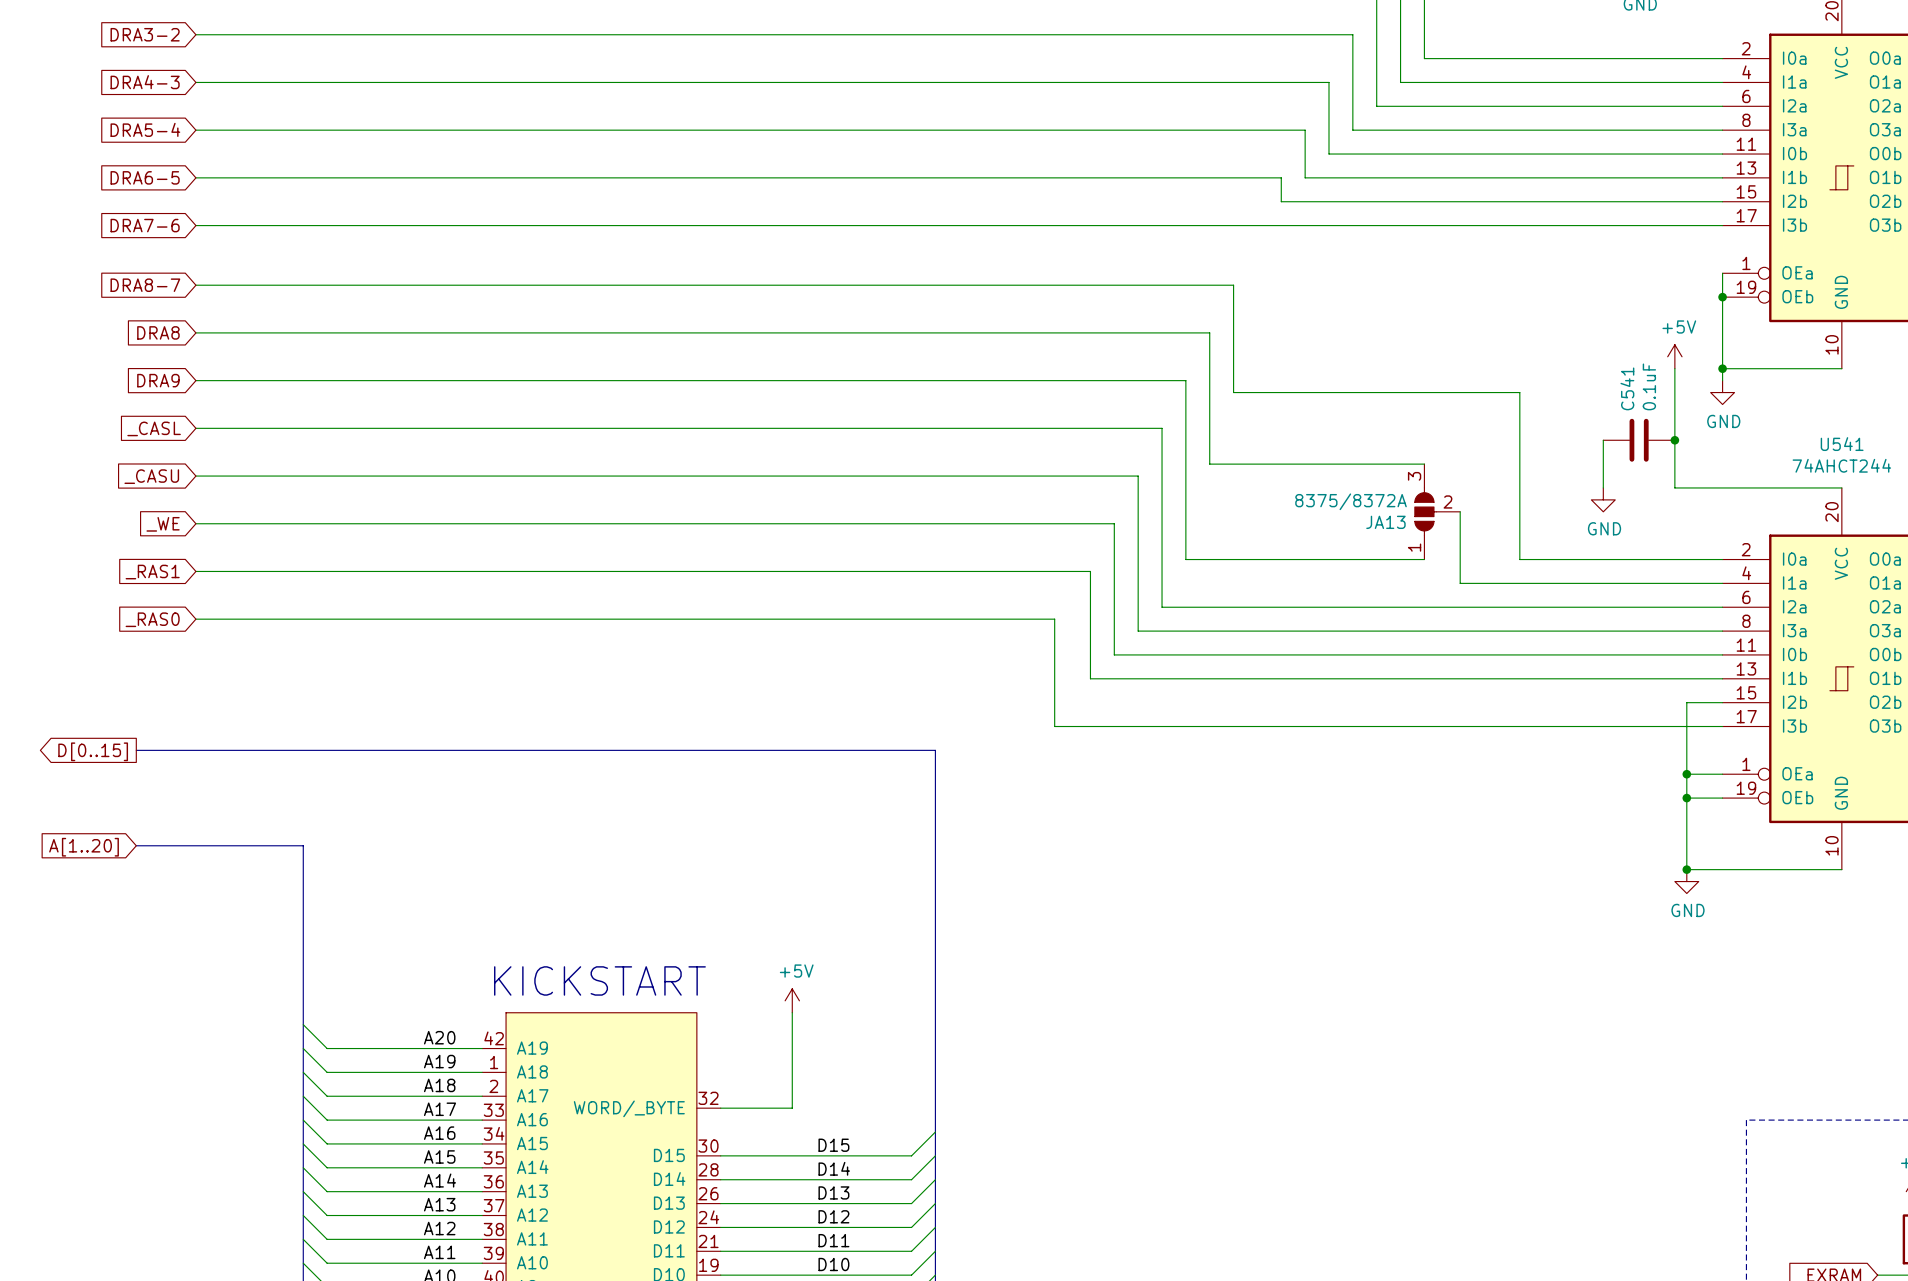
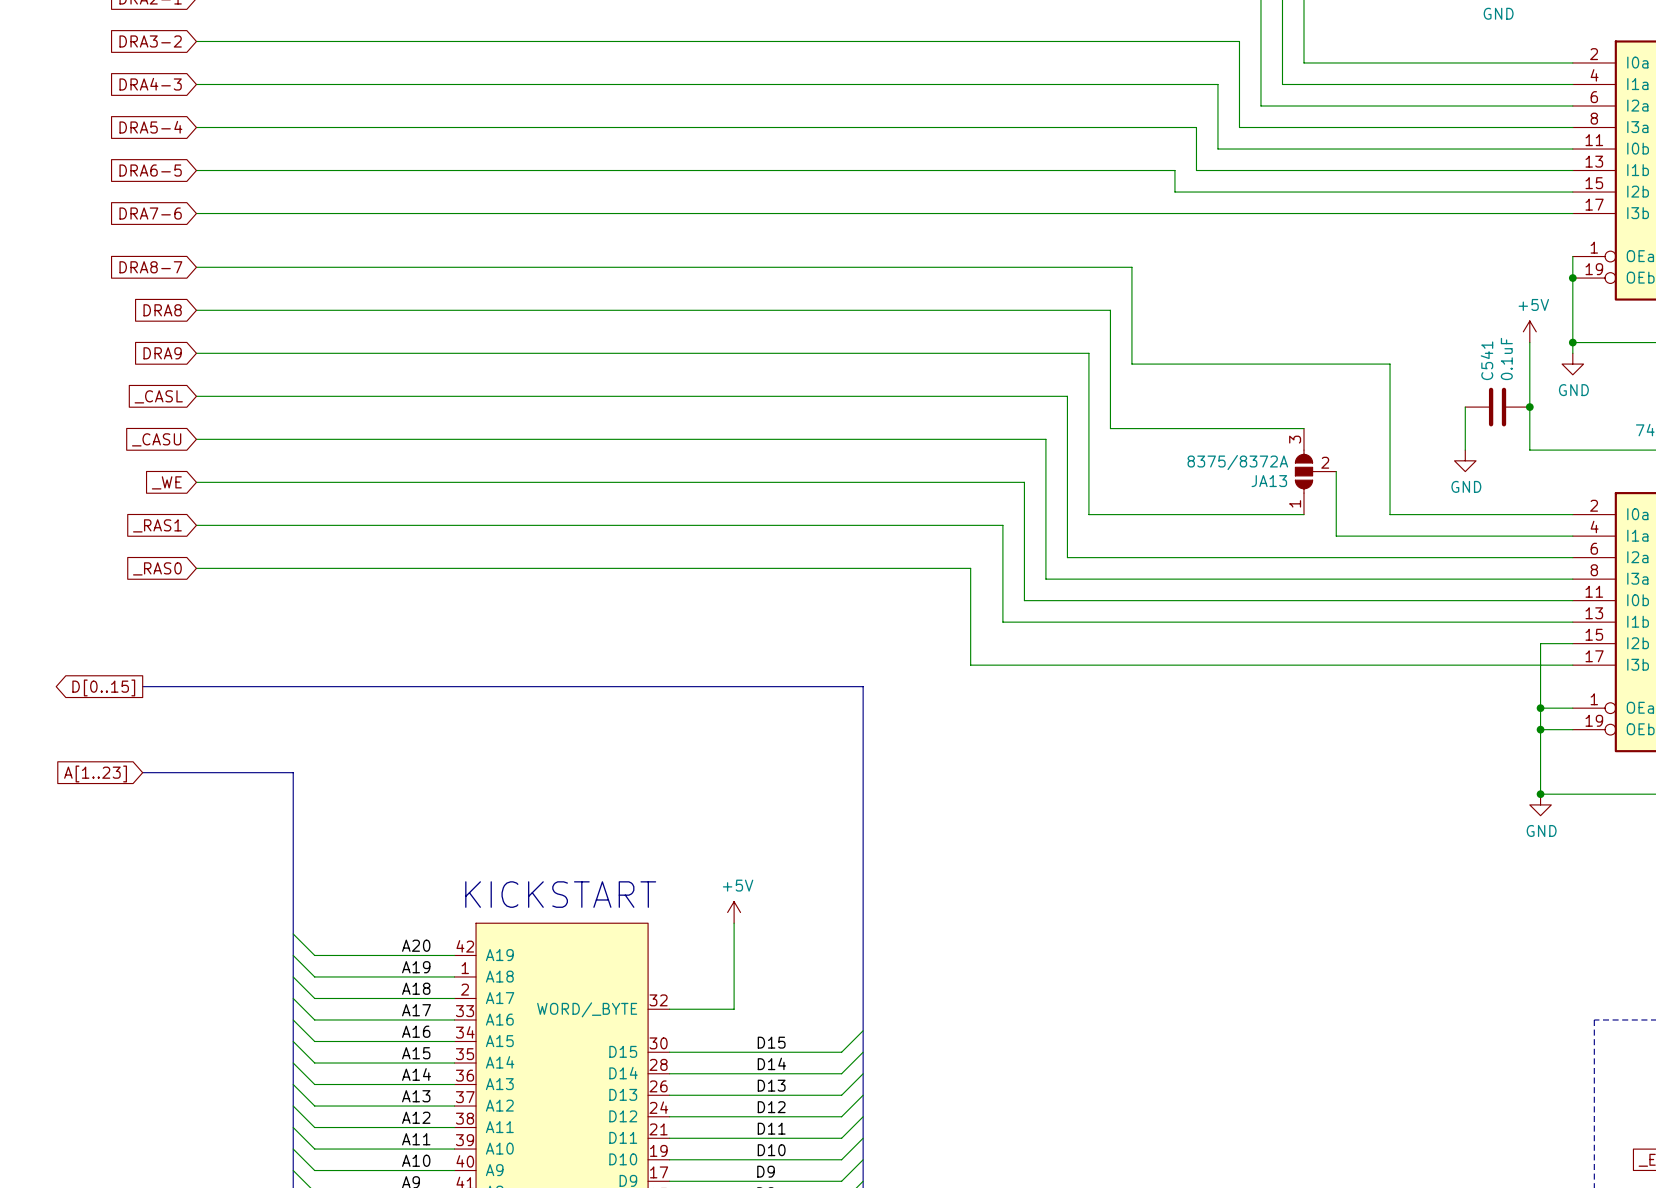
global label: A[1..20] (84, 847) -> A[1..23] (95, 773)

